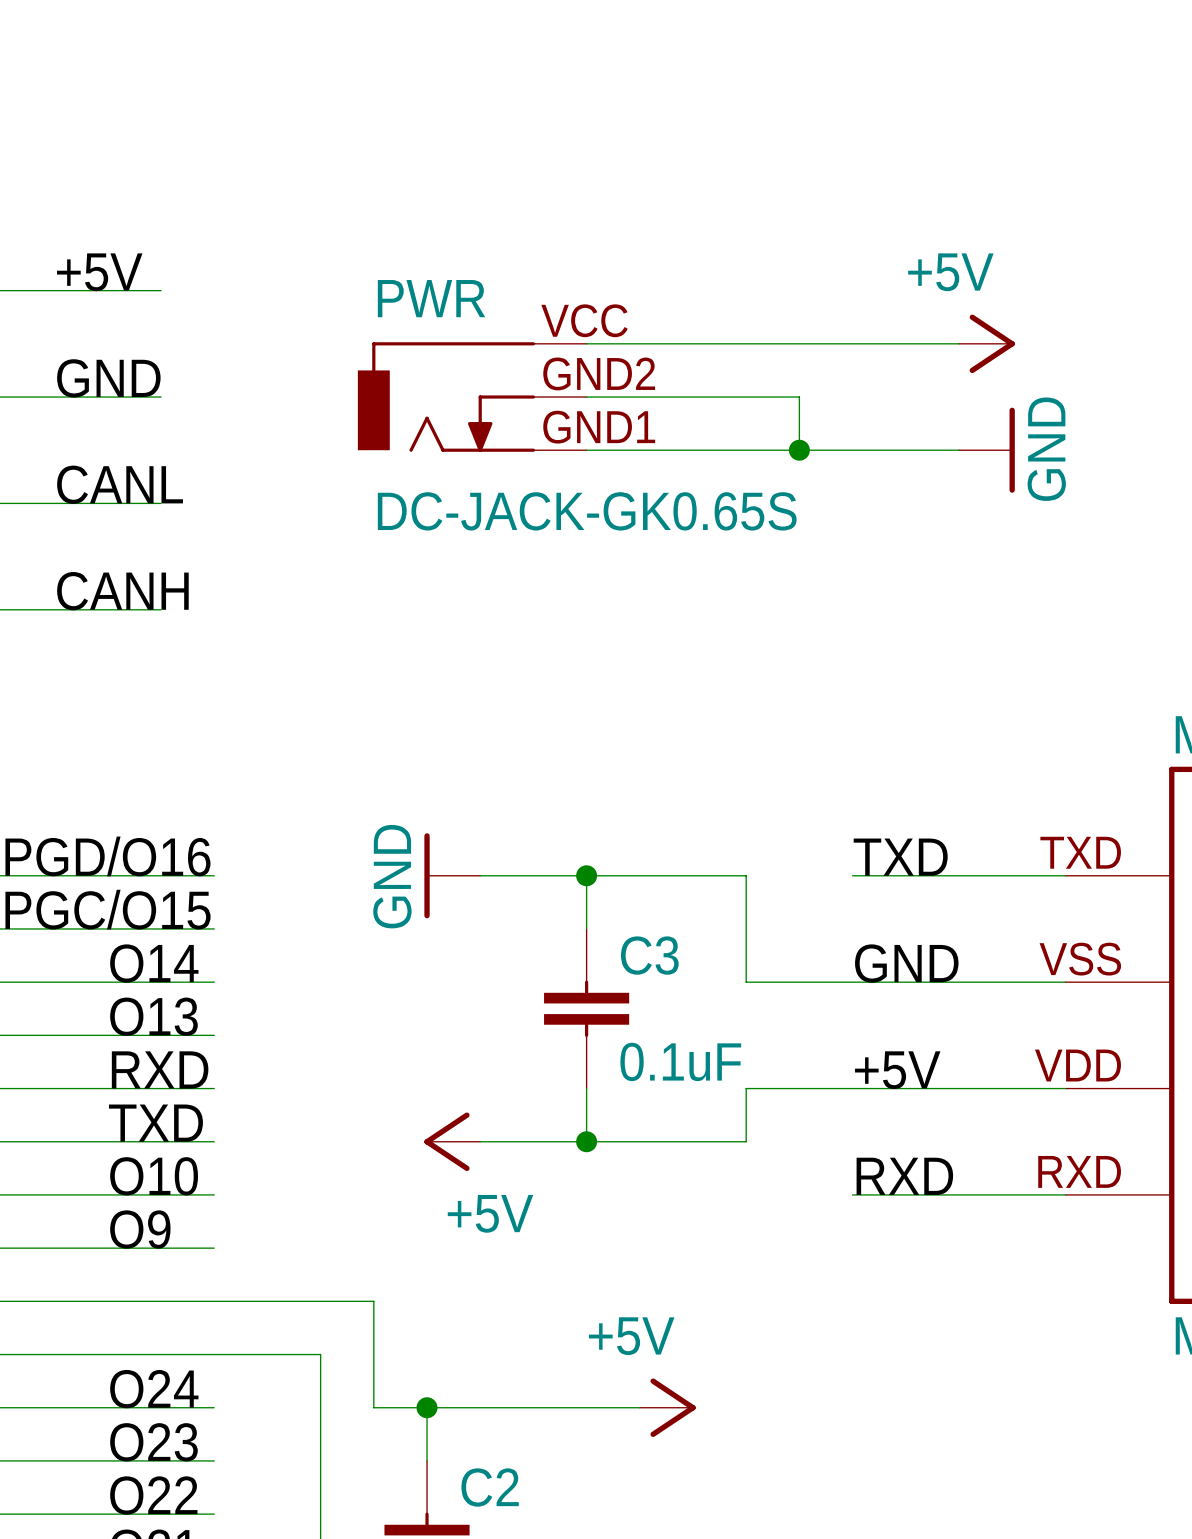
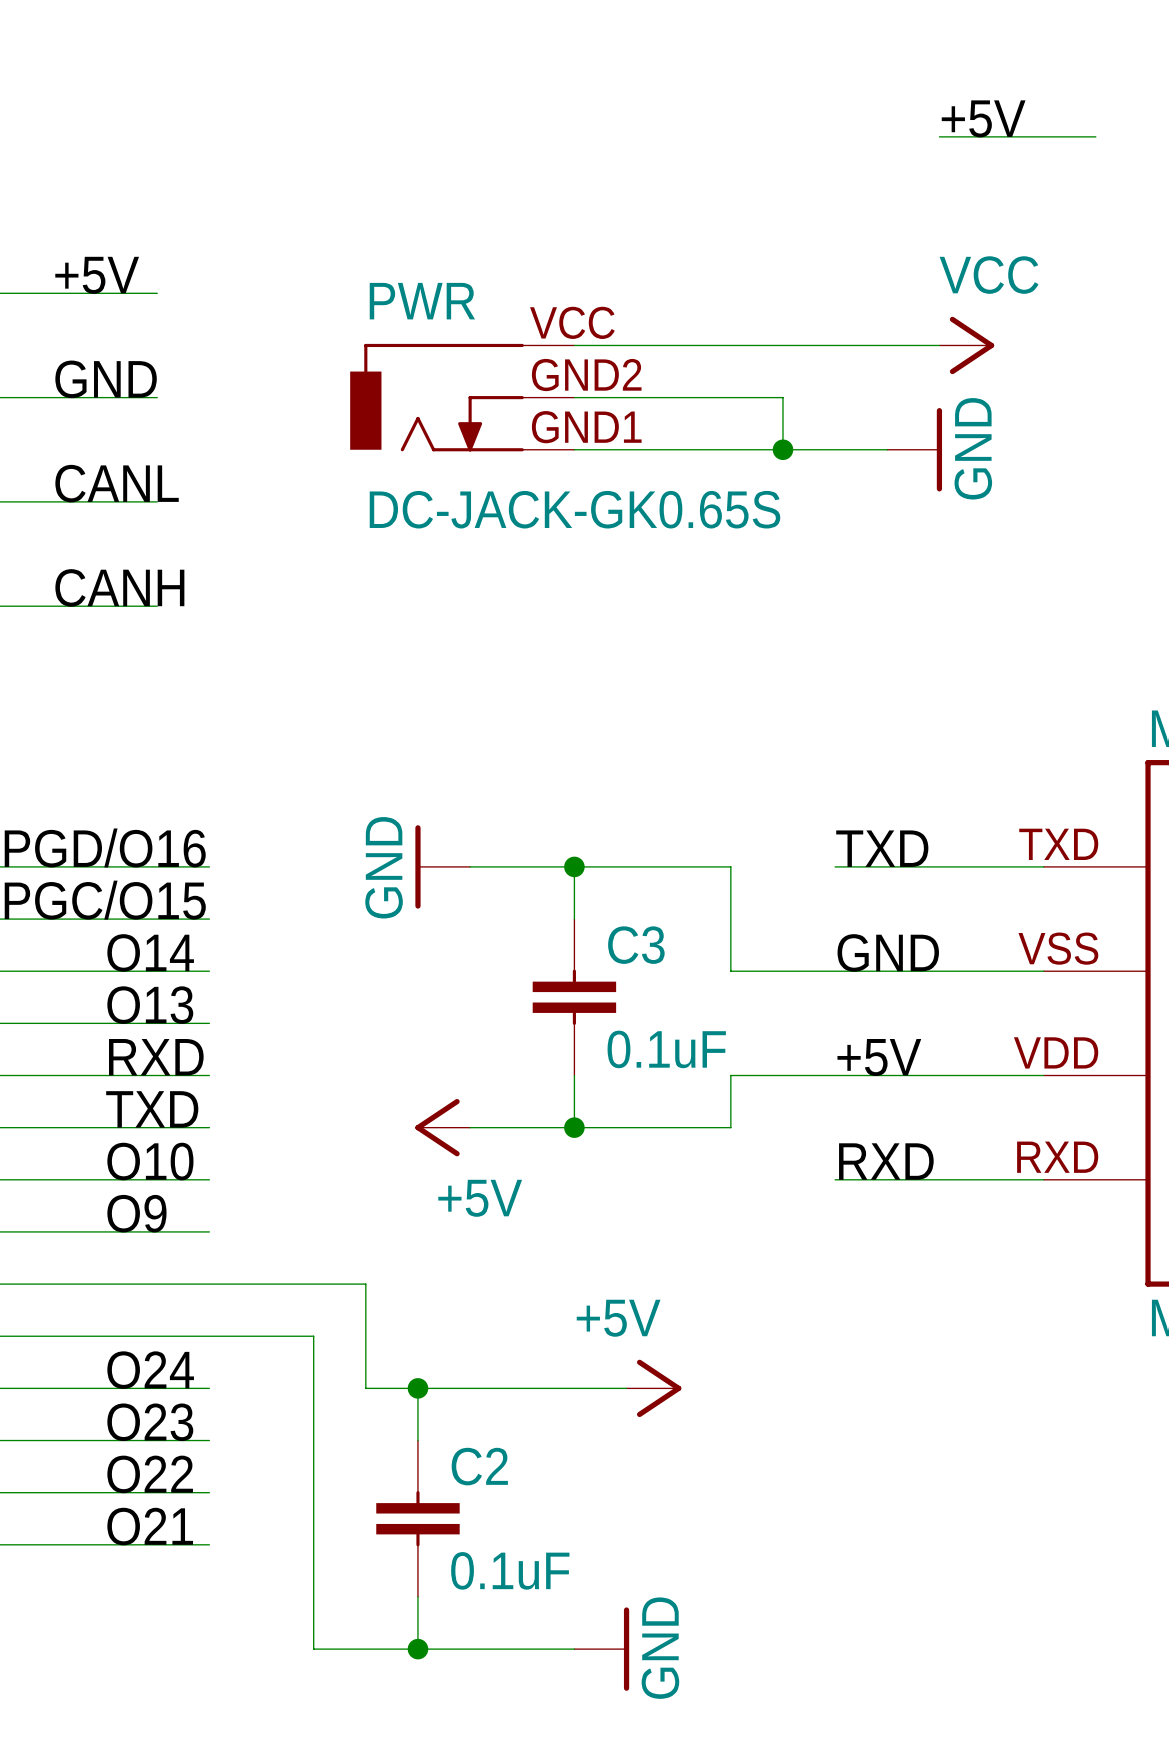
label: none -> +5V (983, 118)
wire: none -> (939, 136) (1095, 136)
power symbol: +5V (986, 343) -> VCC (966, 345)
power symbol position: GND (986, 450) -> GND (914, 449)

